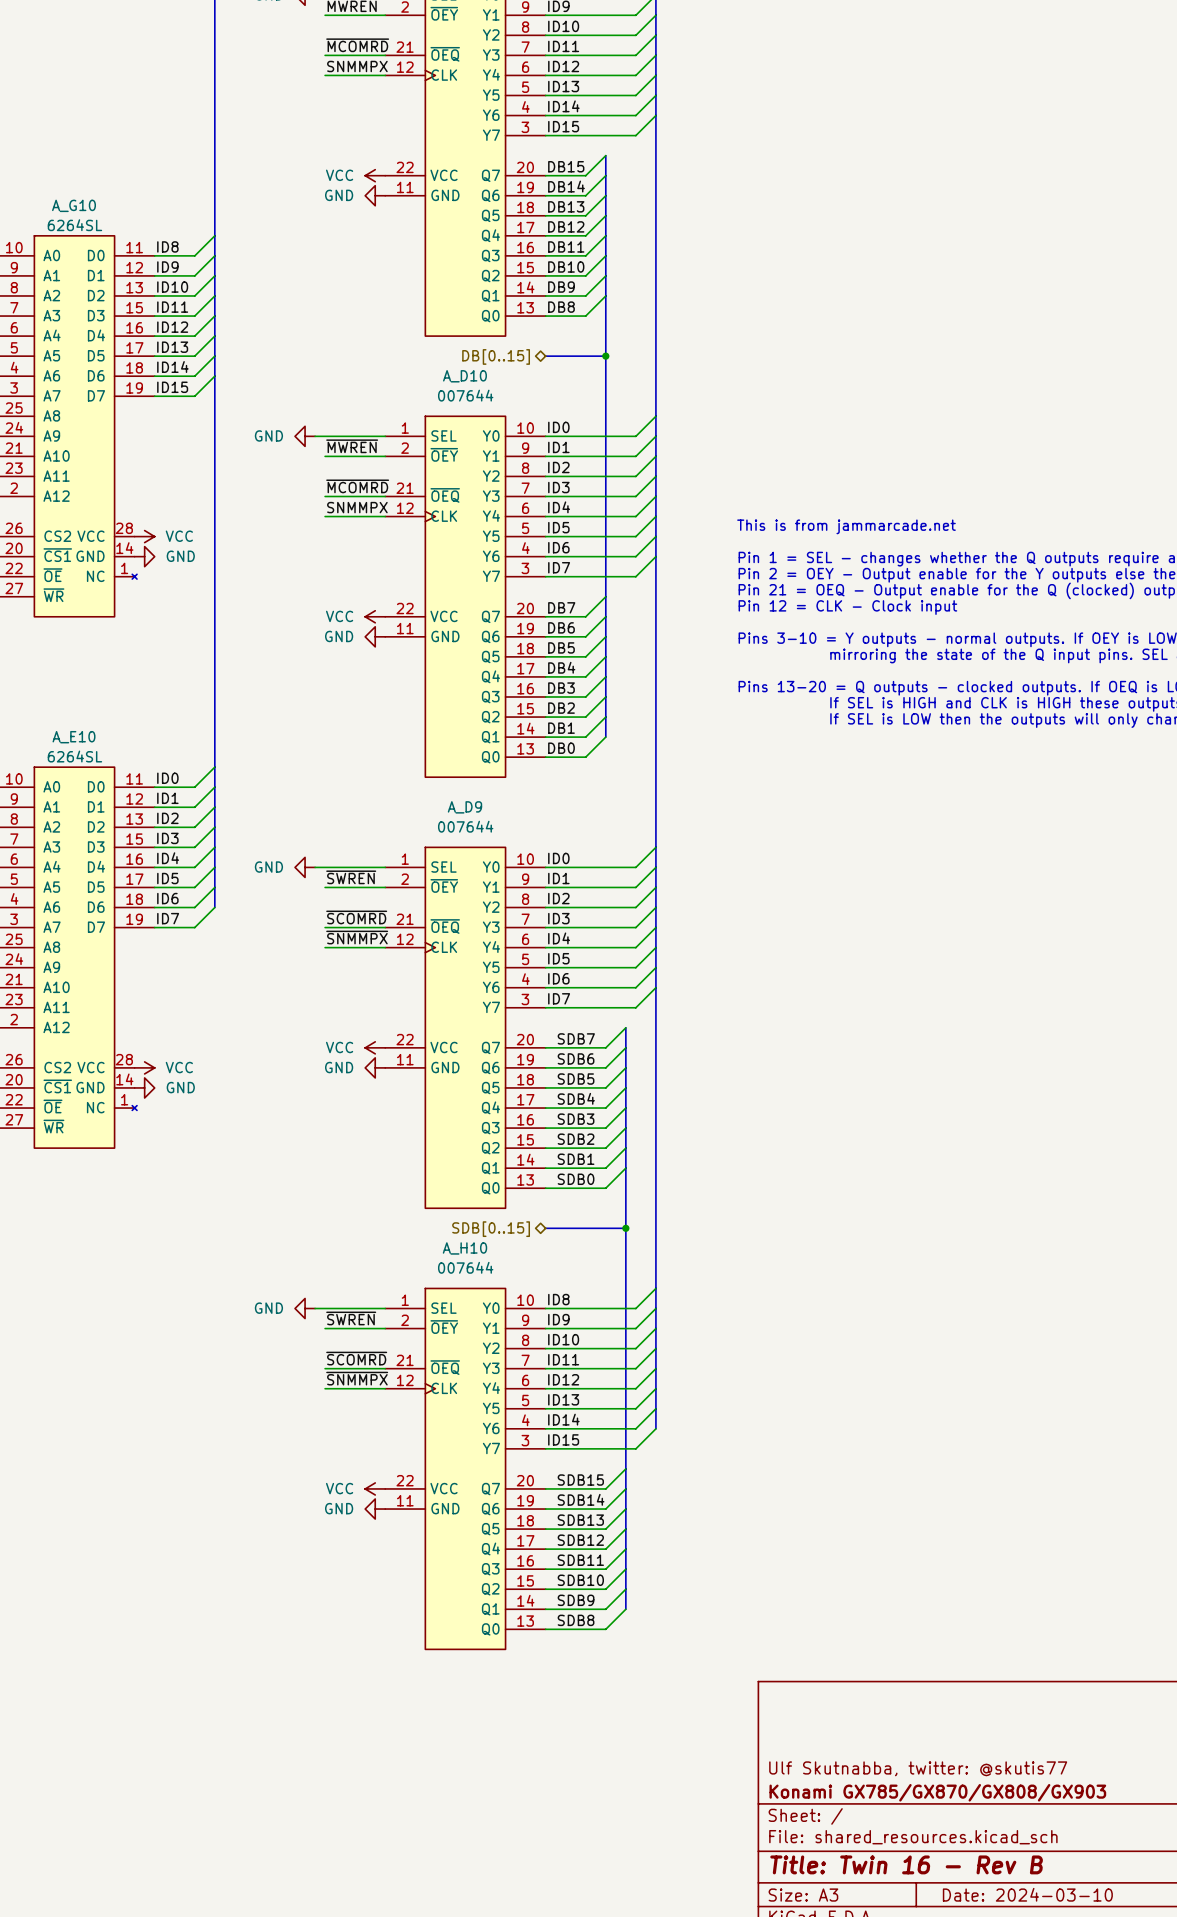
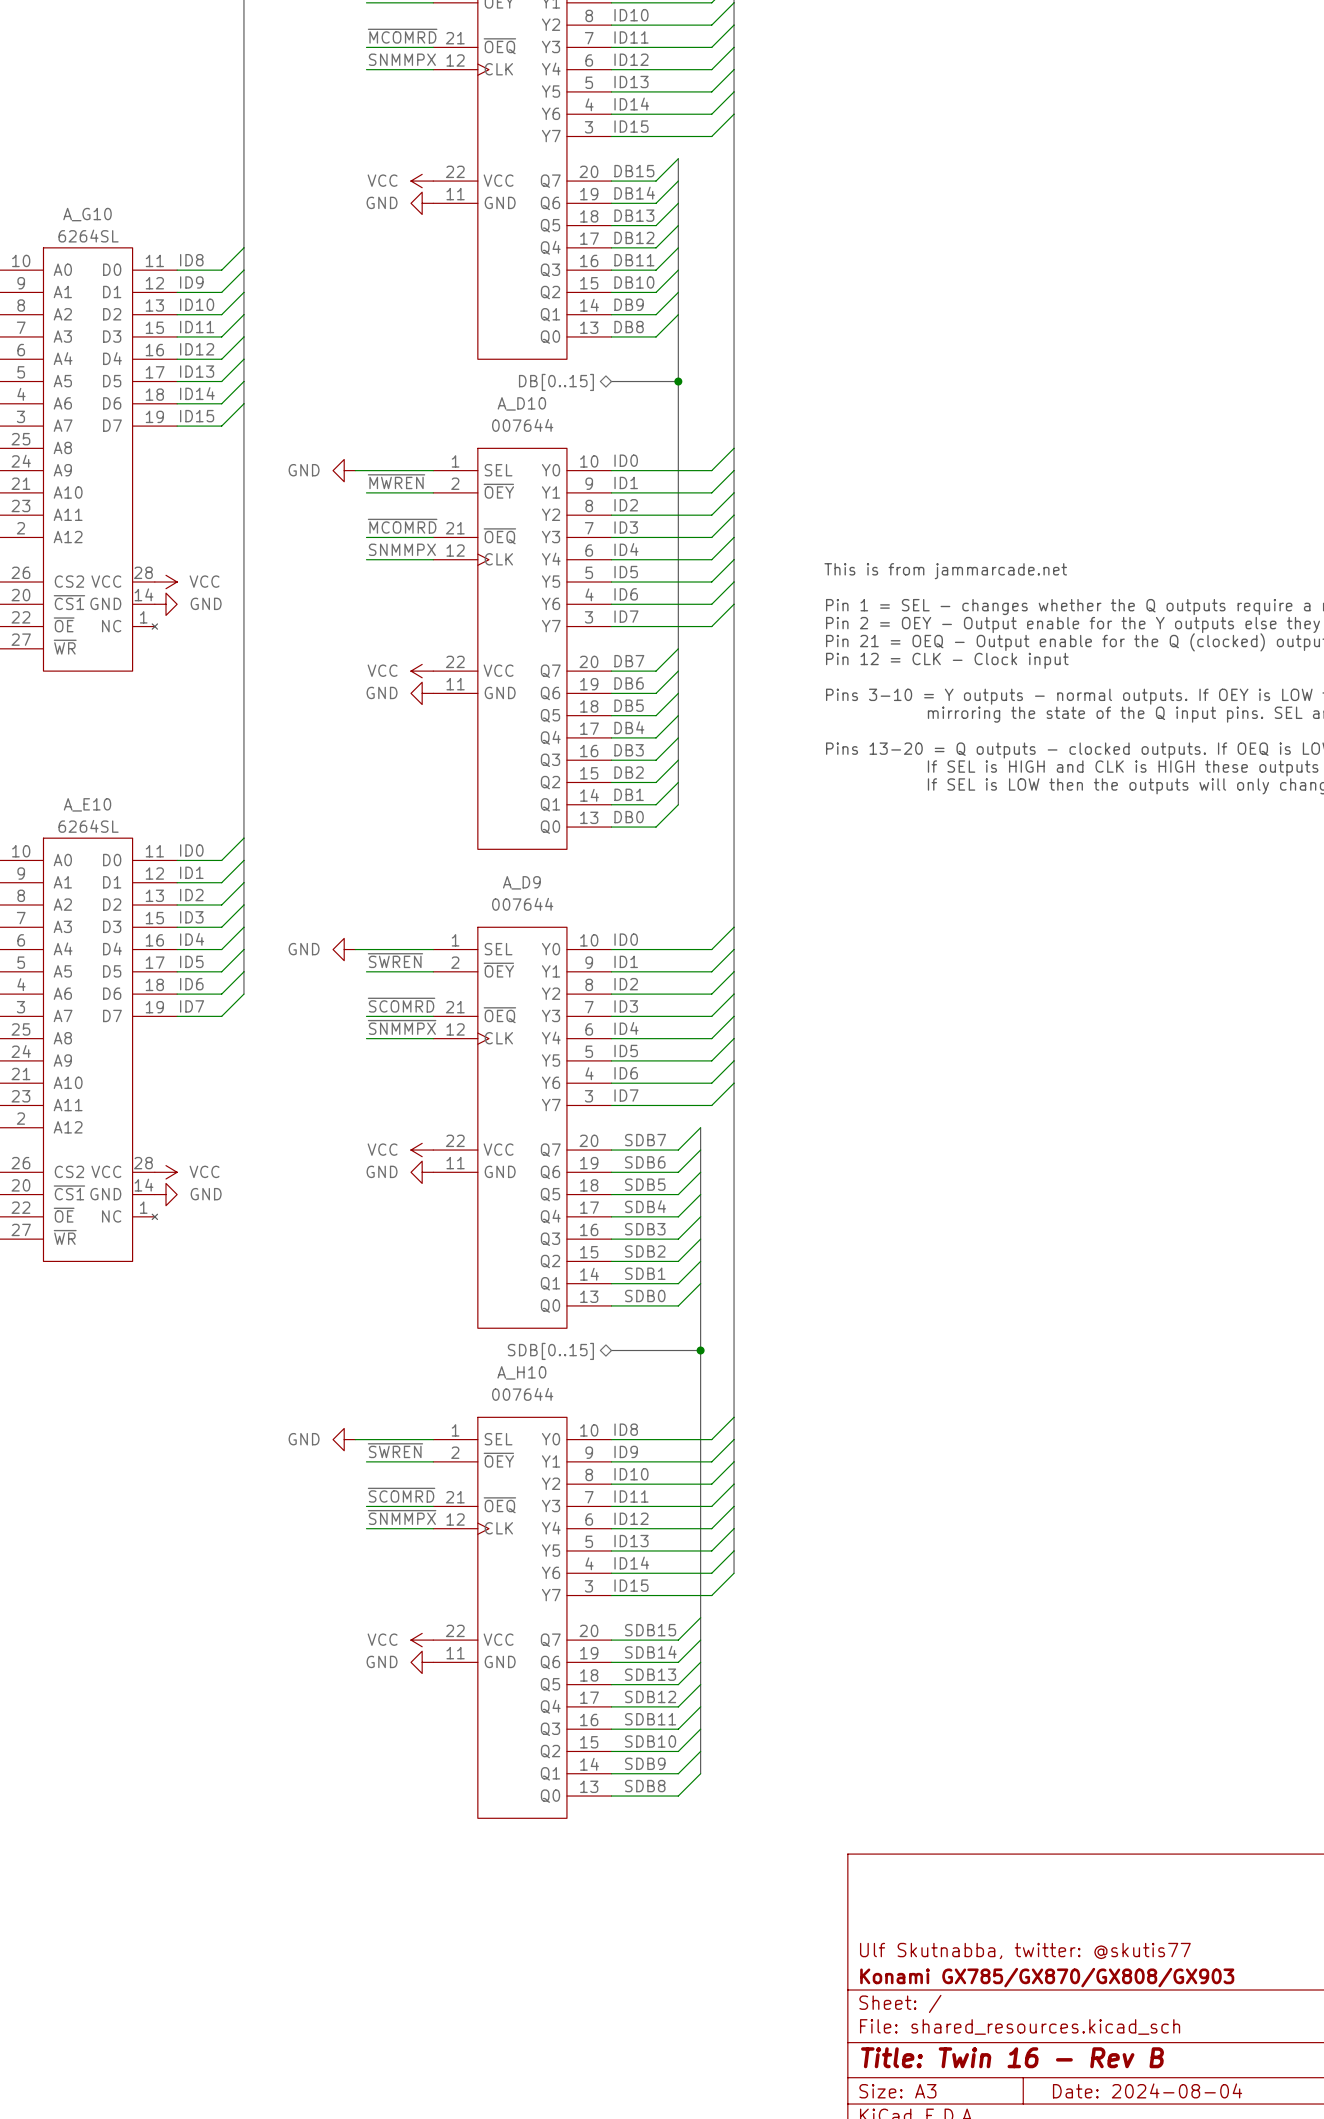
title block: Date: 2024-03-10 (1027, 1894) -> Date: 2024-08-04 (1147, 2090)

